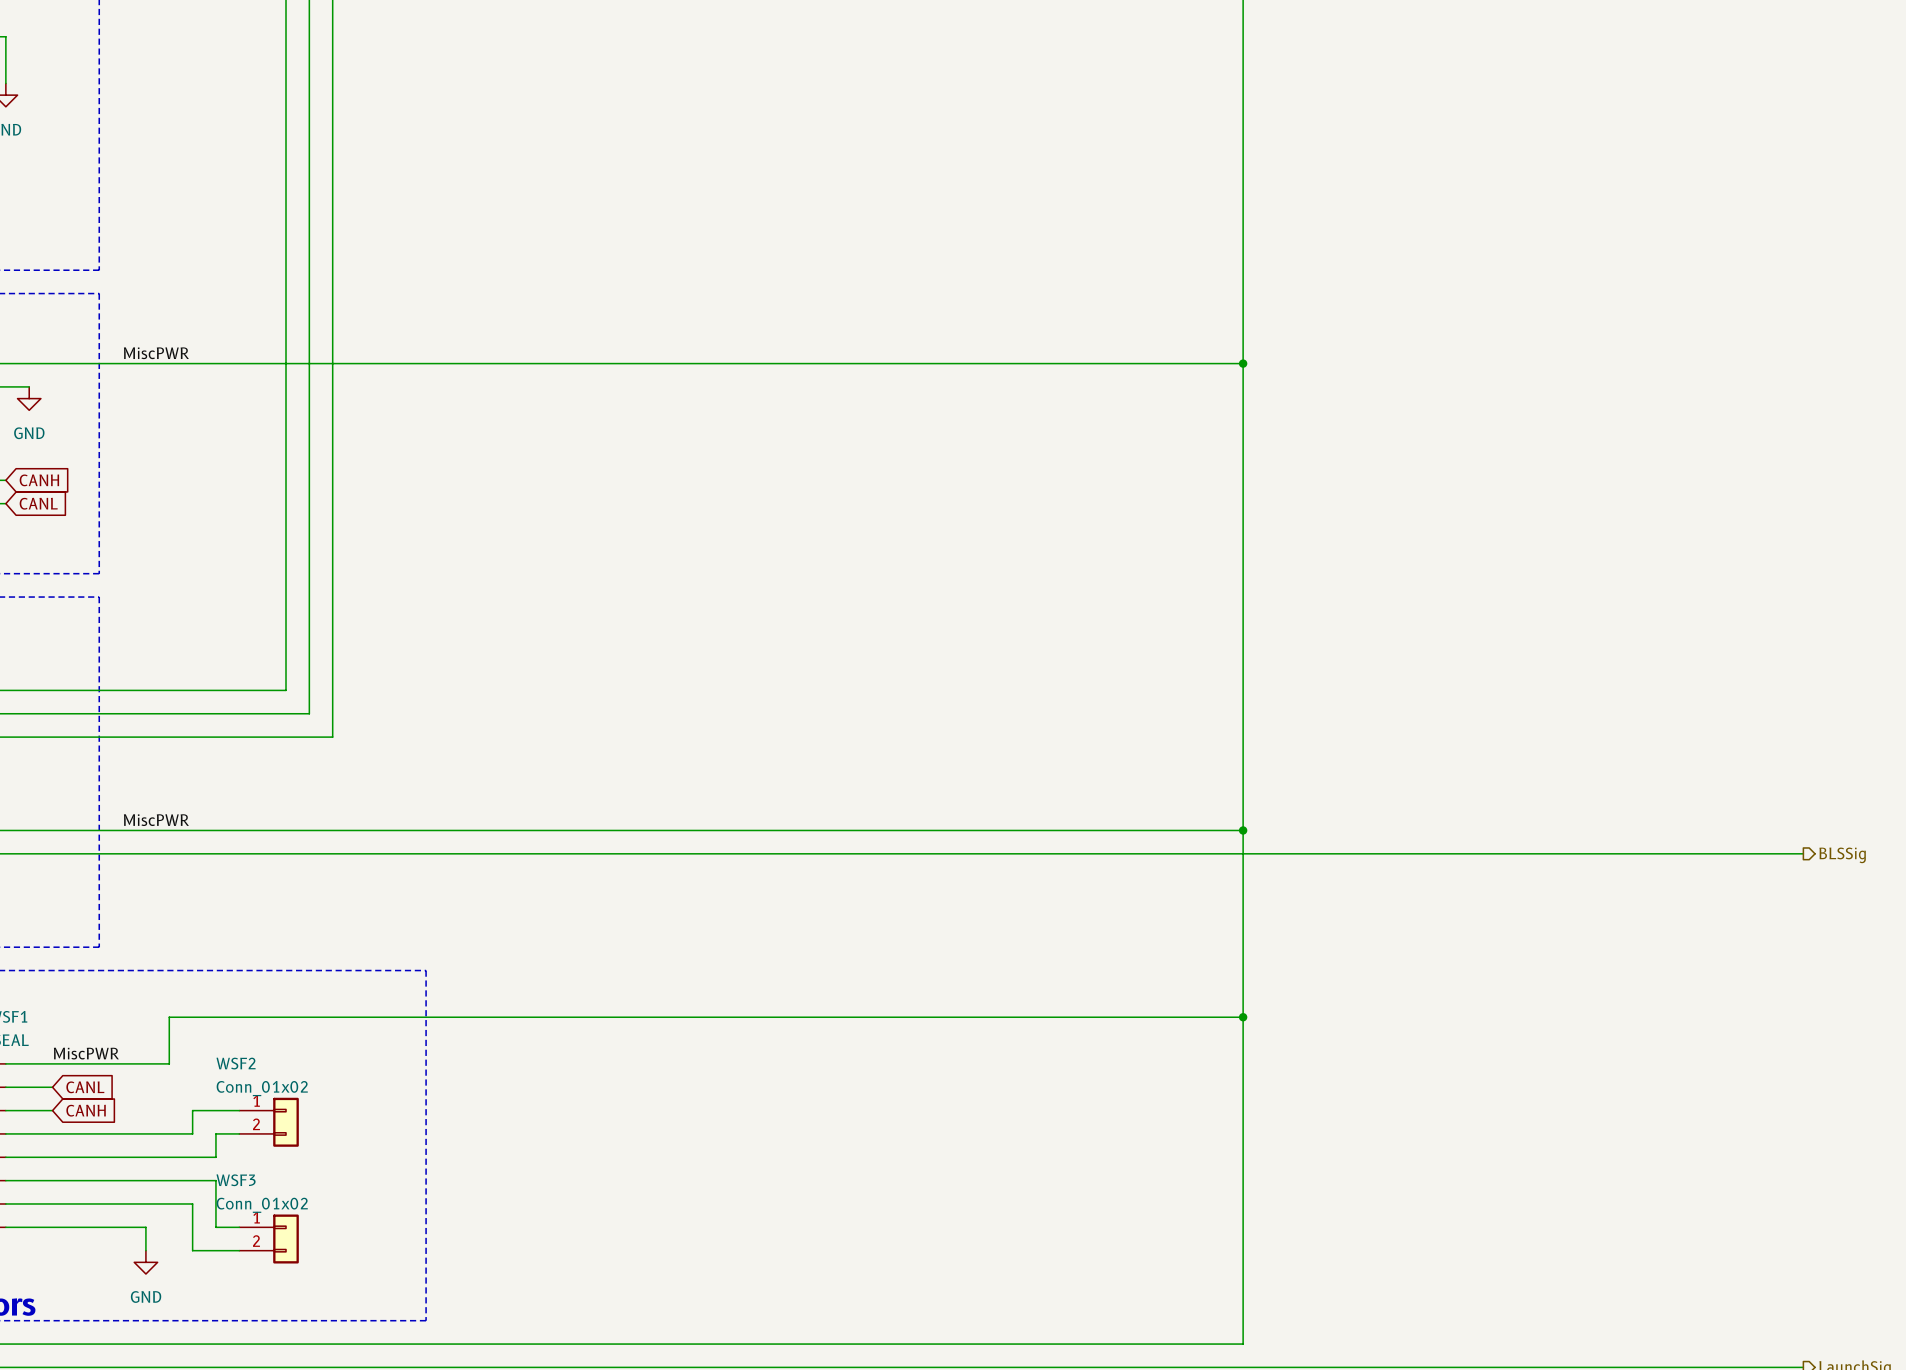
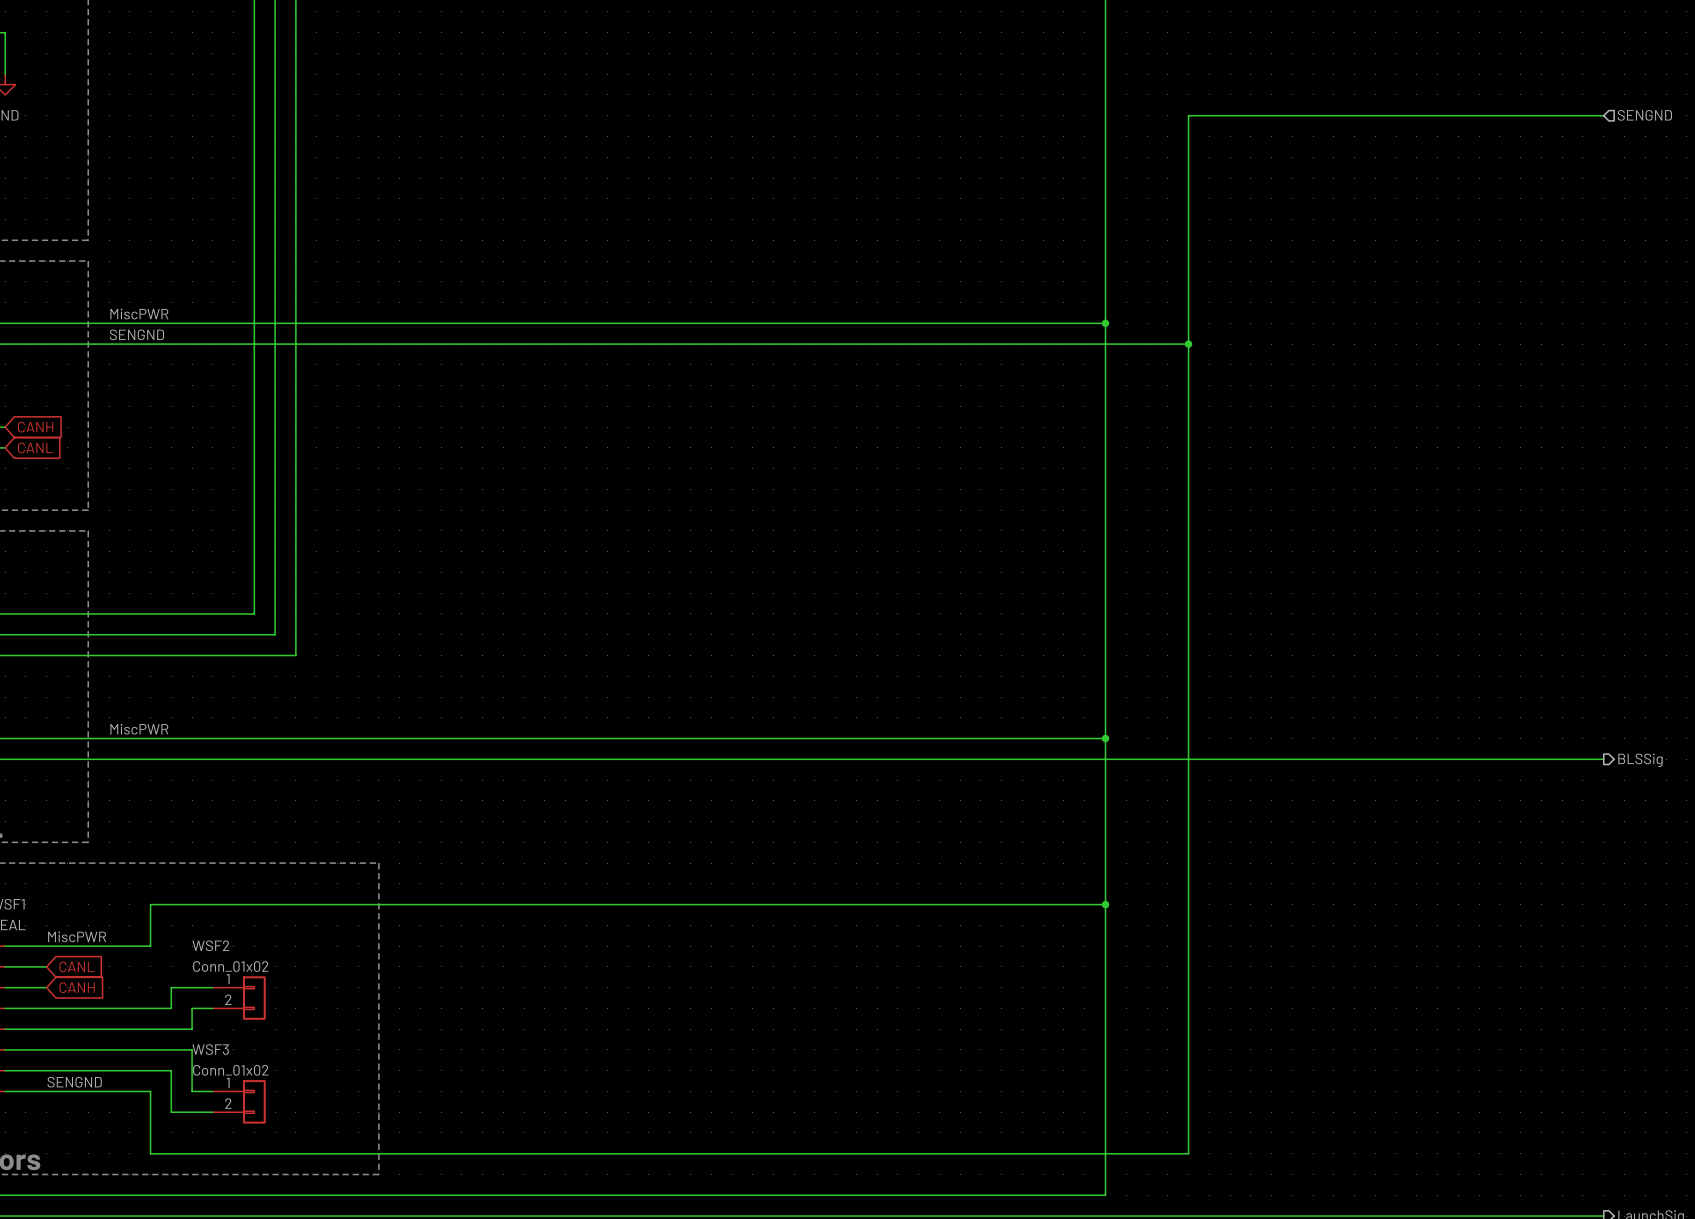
hierarchical label: none -> SENGND (1644, 115)
label: none -> SENGND (136, 334)
wire: none -> (25, 344) (1188, 344)
junction: none -> (1188, 344)
power symbol: GND (29, 398) -> none
label: none -> SENGND (74, 1082)
wire: (145, 1227) (145, 1250) -> (129, 1091) (150, 1091) (150, 1153) (1188, 1153) (1188, 115) (1603, 115)
power symbol: GND (145, 1262) -> none

